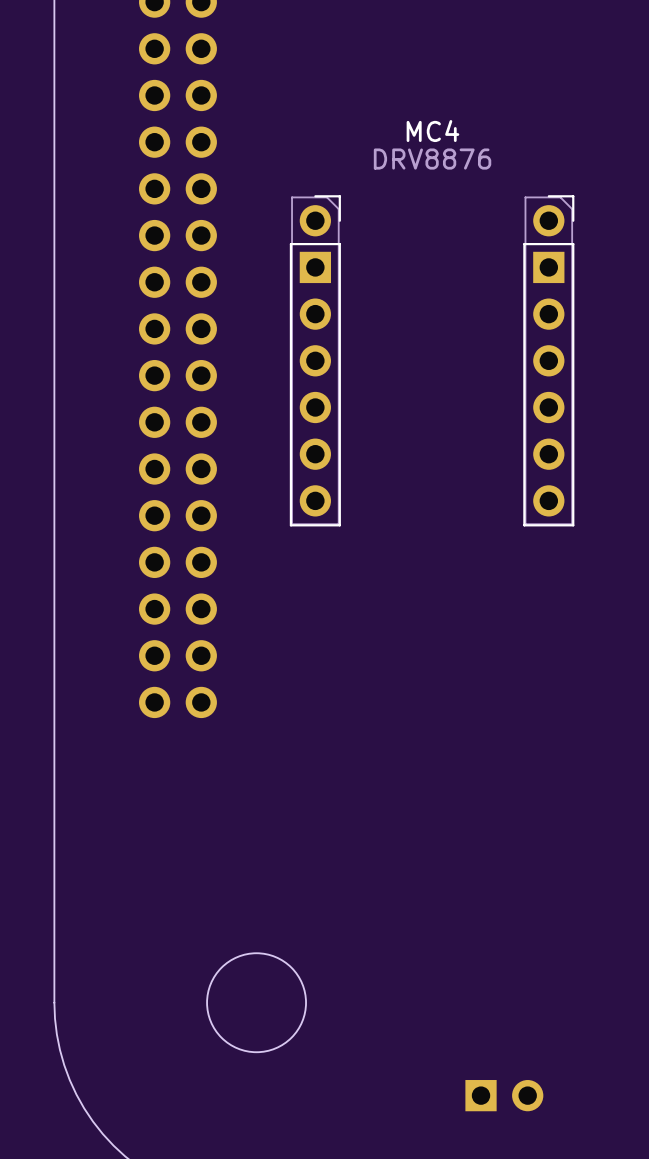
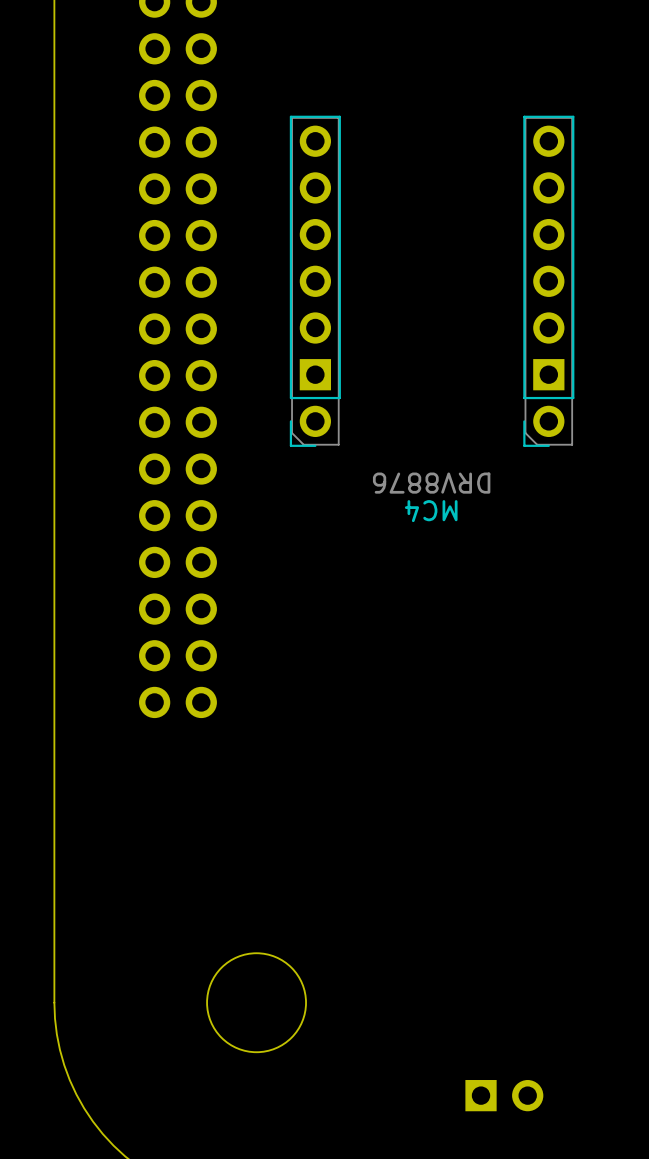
MC4 rotation: 0° (432, 360) -> 180° (432, 281)

